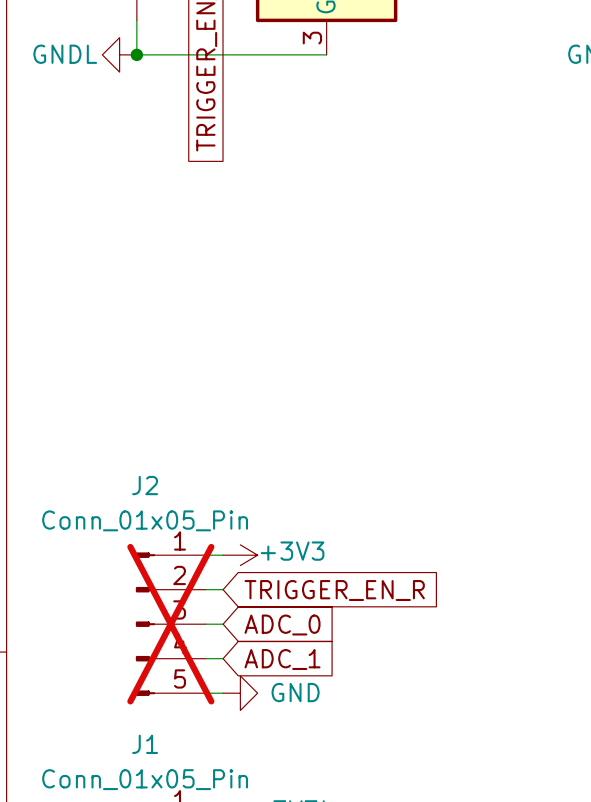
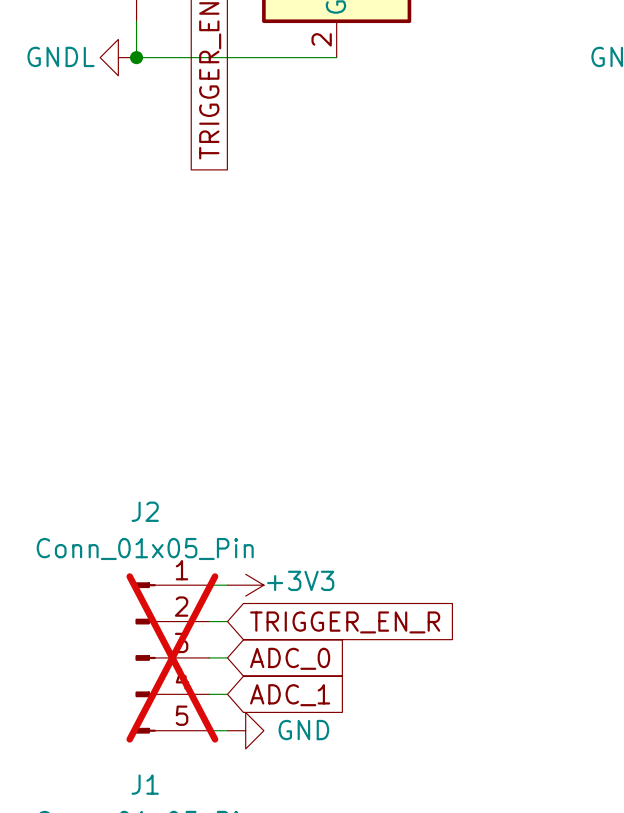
part pin number: 3 (312, 38) -> 2 (321, 39)

